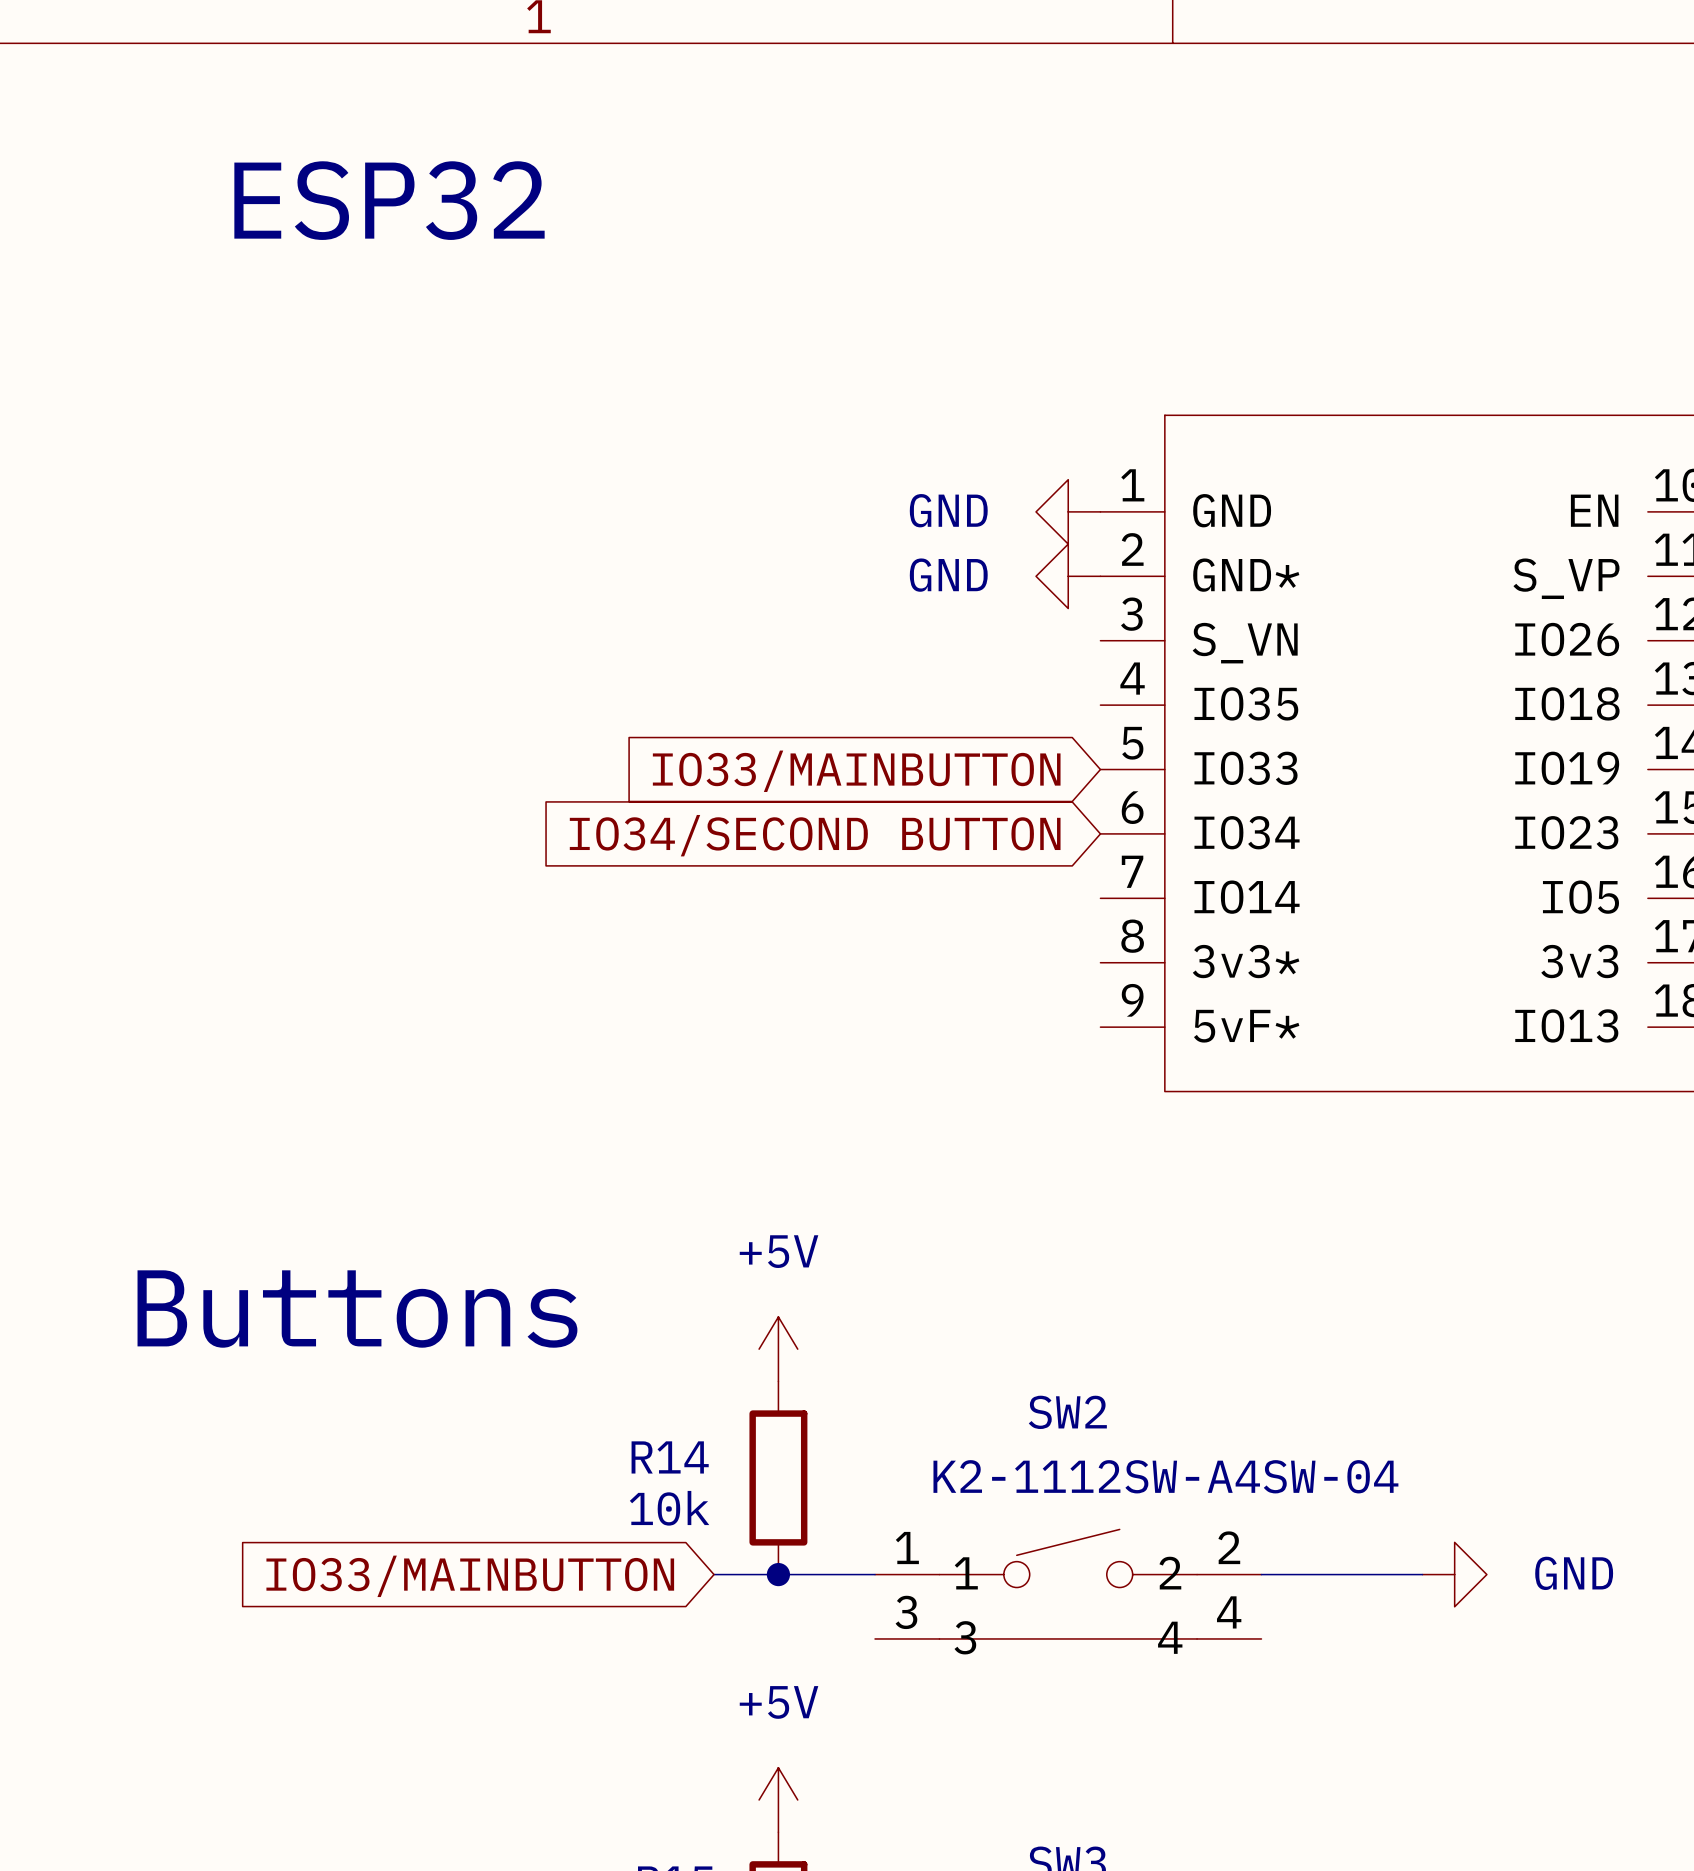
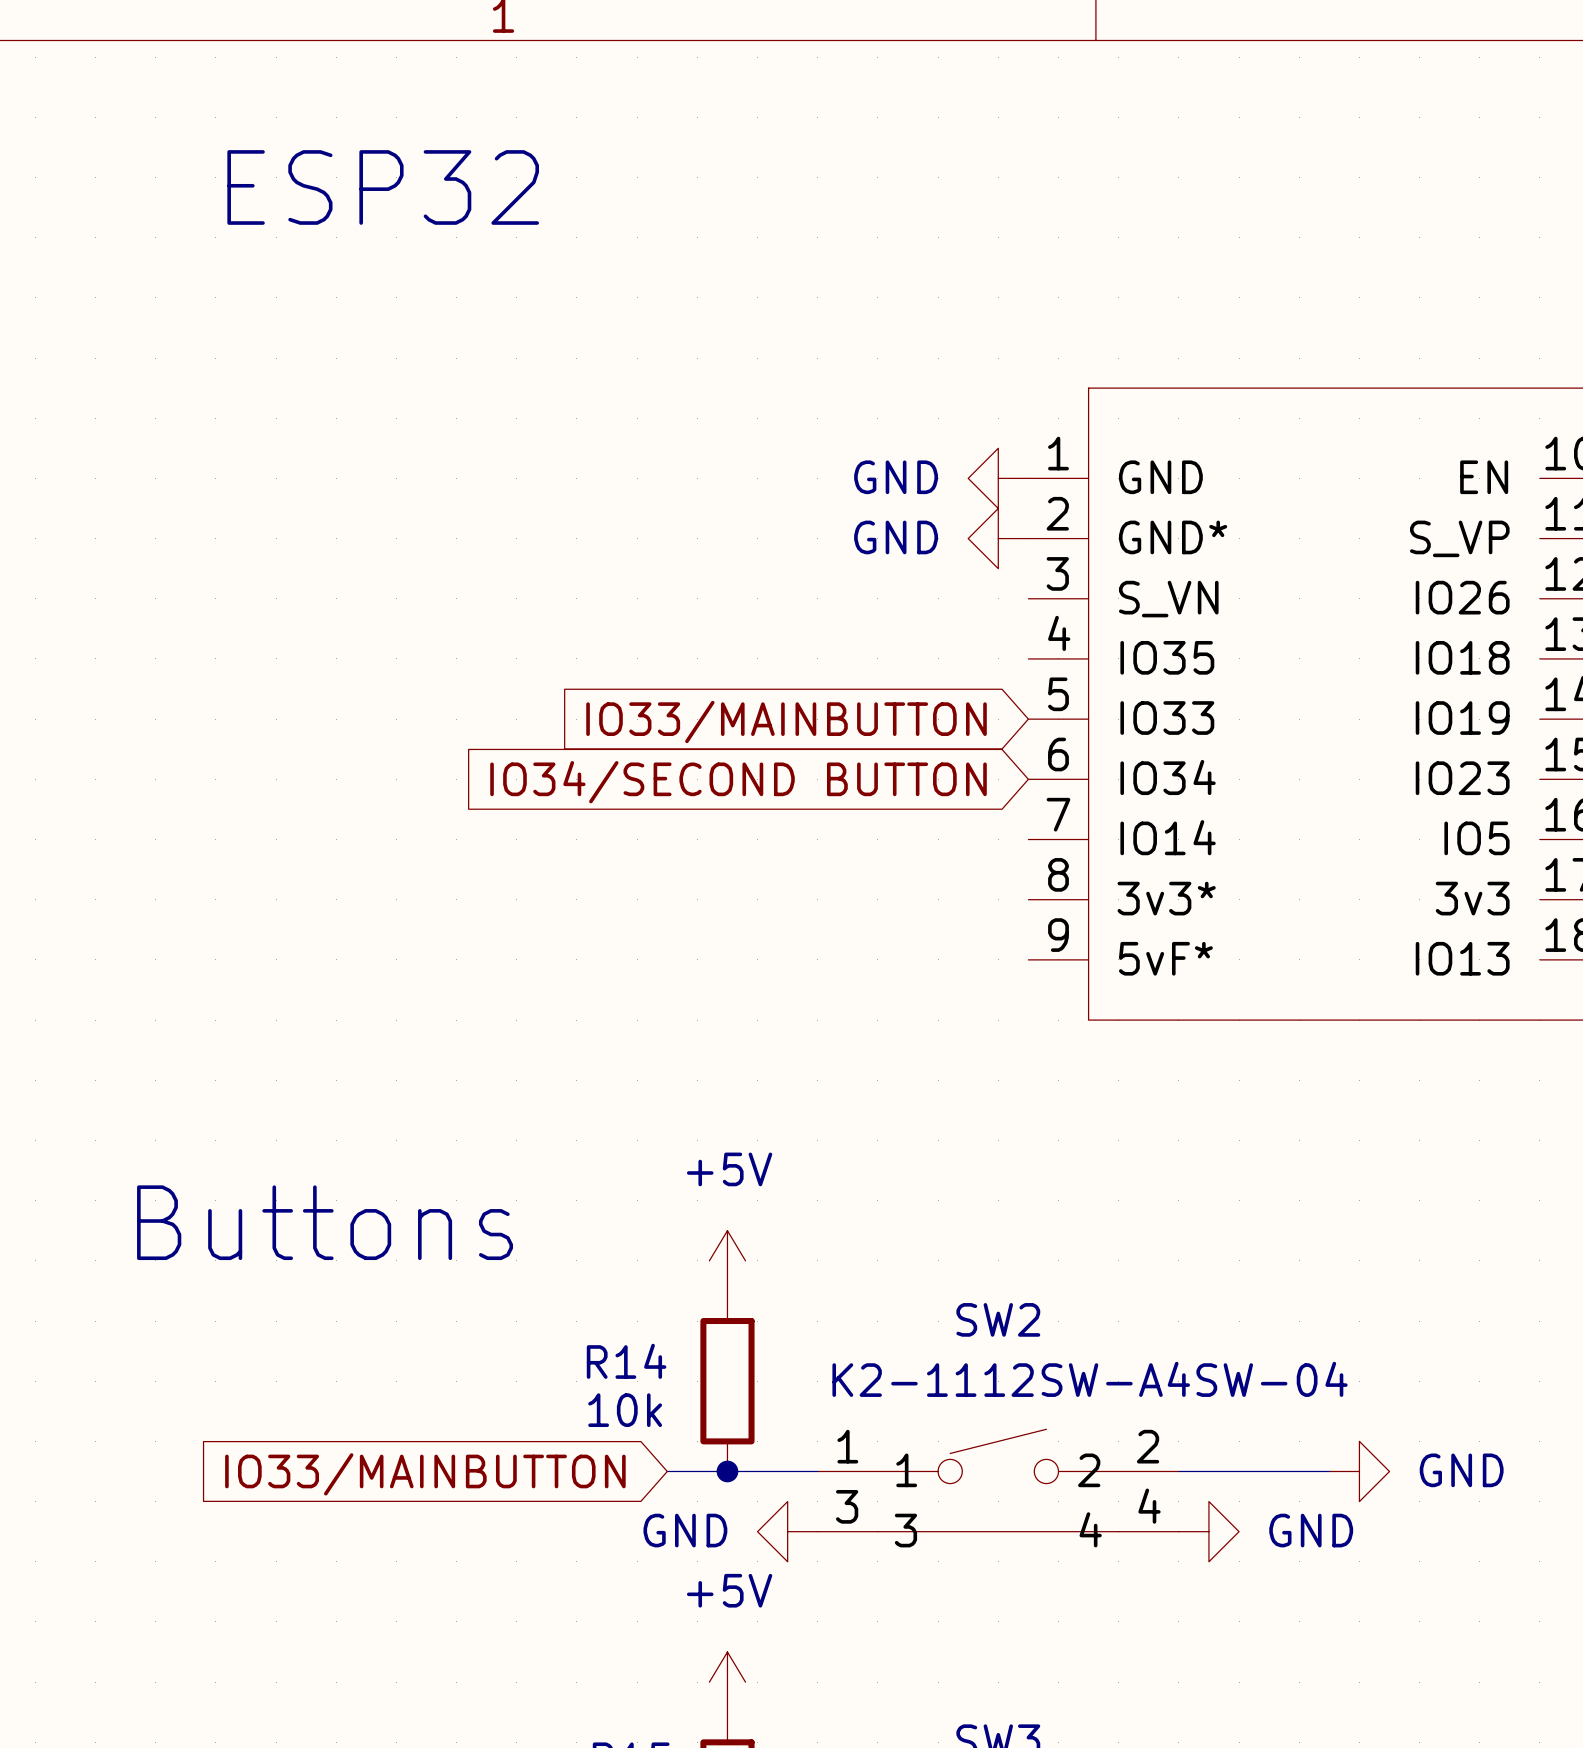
power symbol: none -> GND (787, 1531)
power symbol: none -> GND (1208, 1531)

